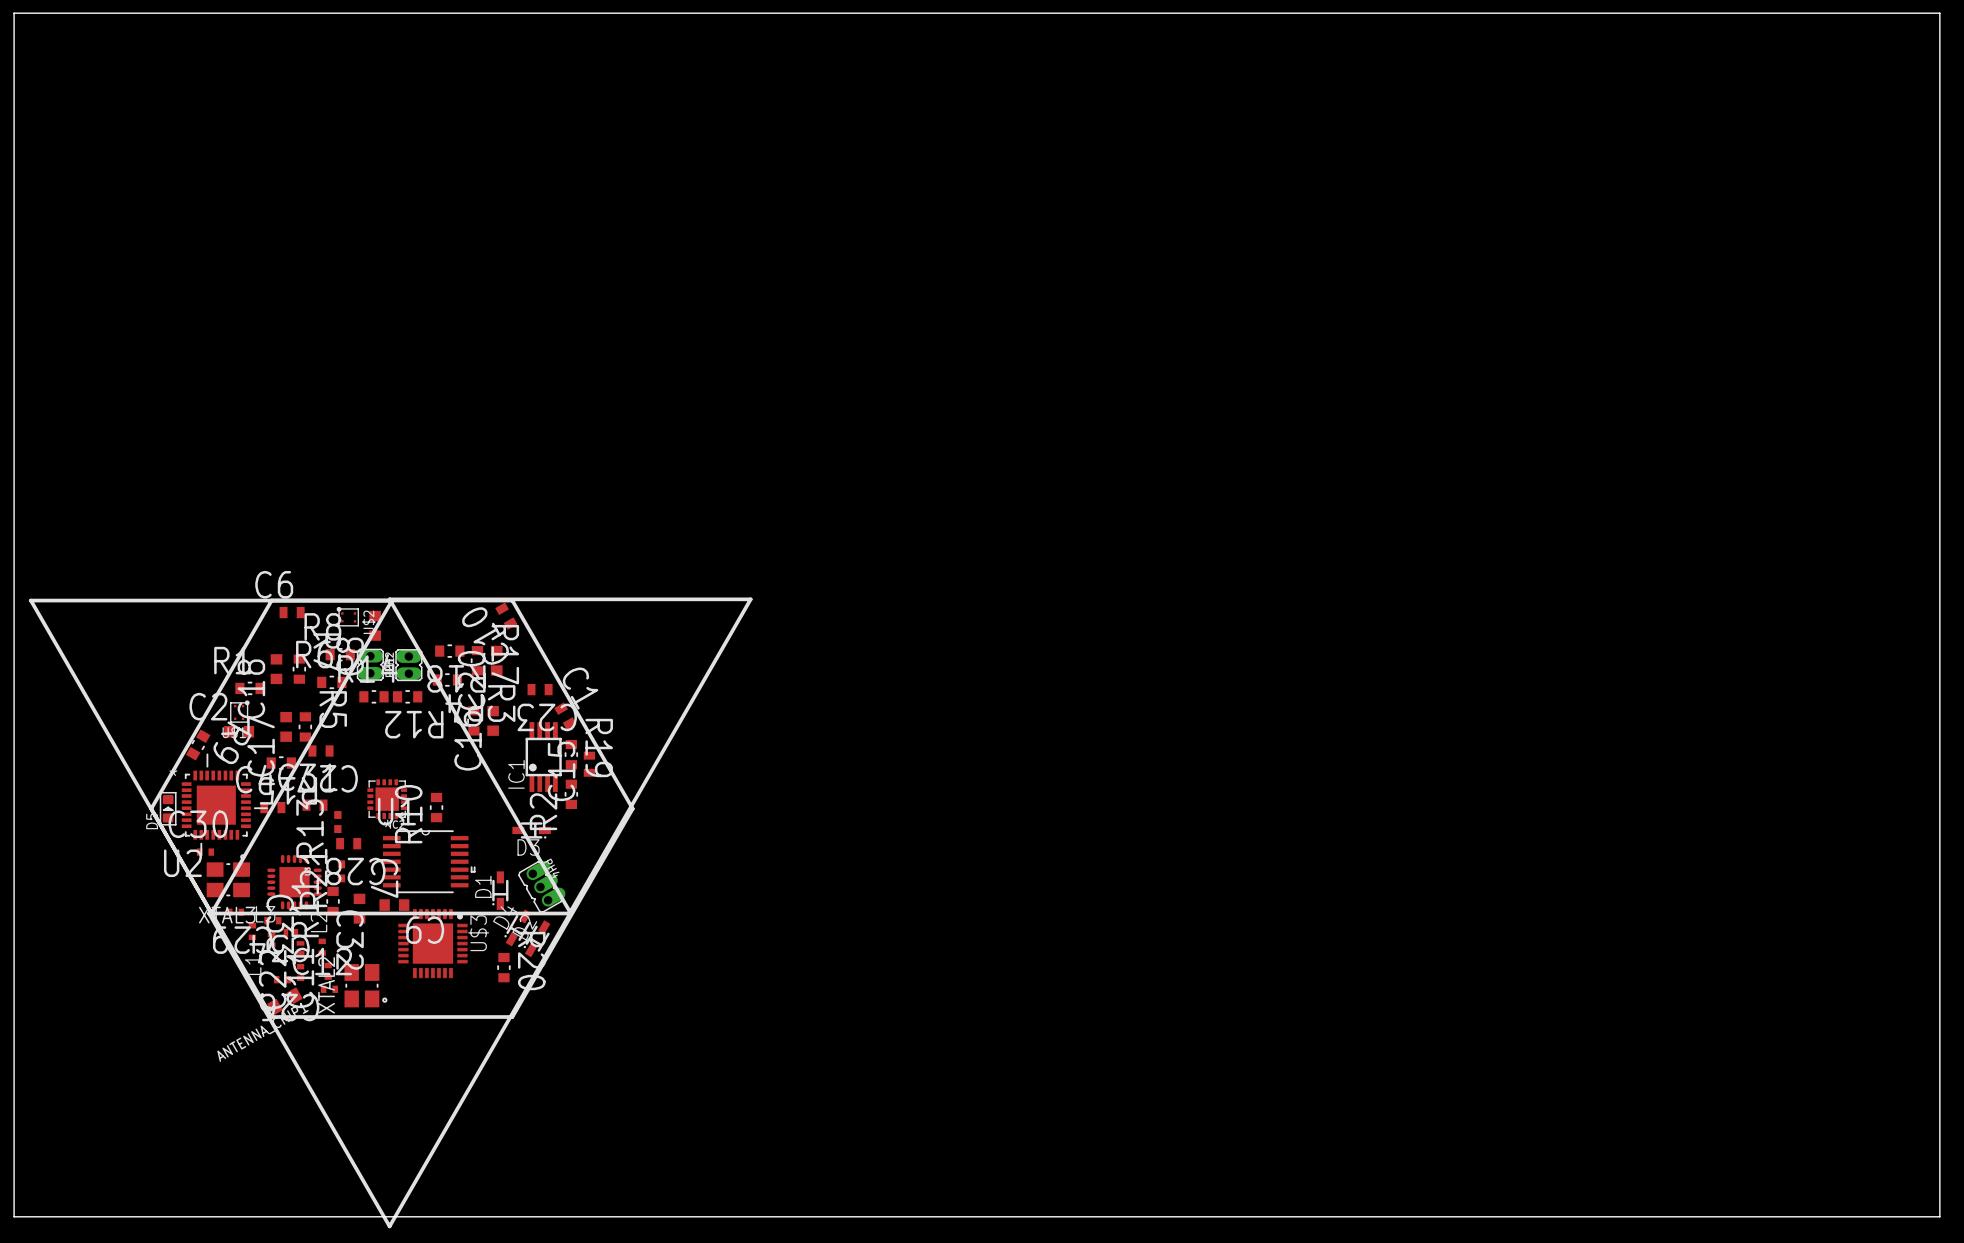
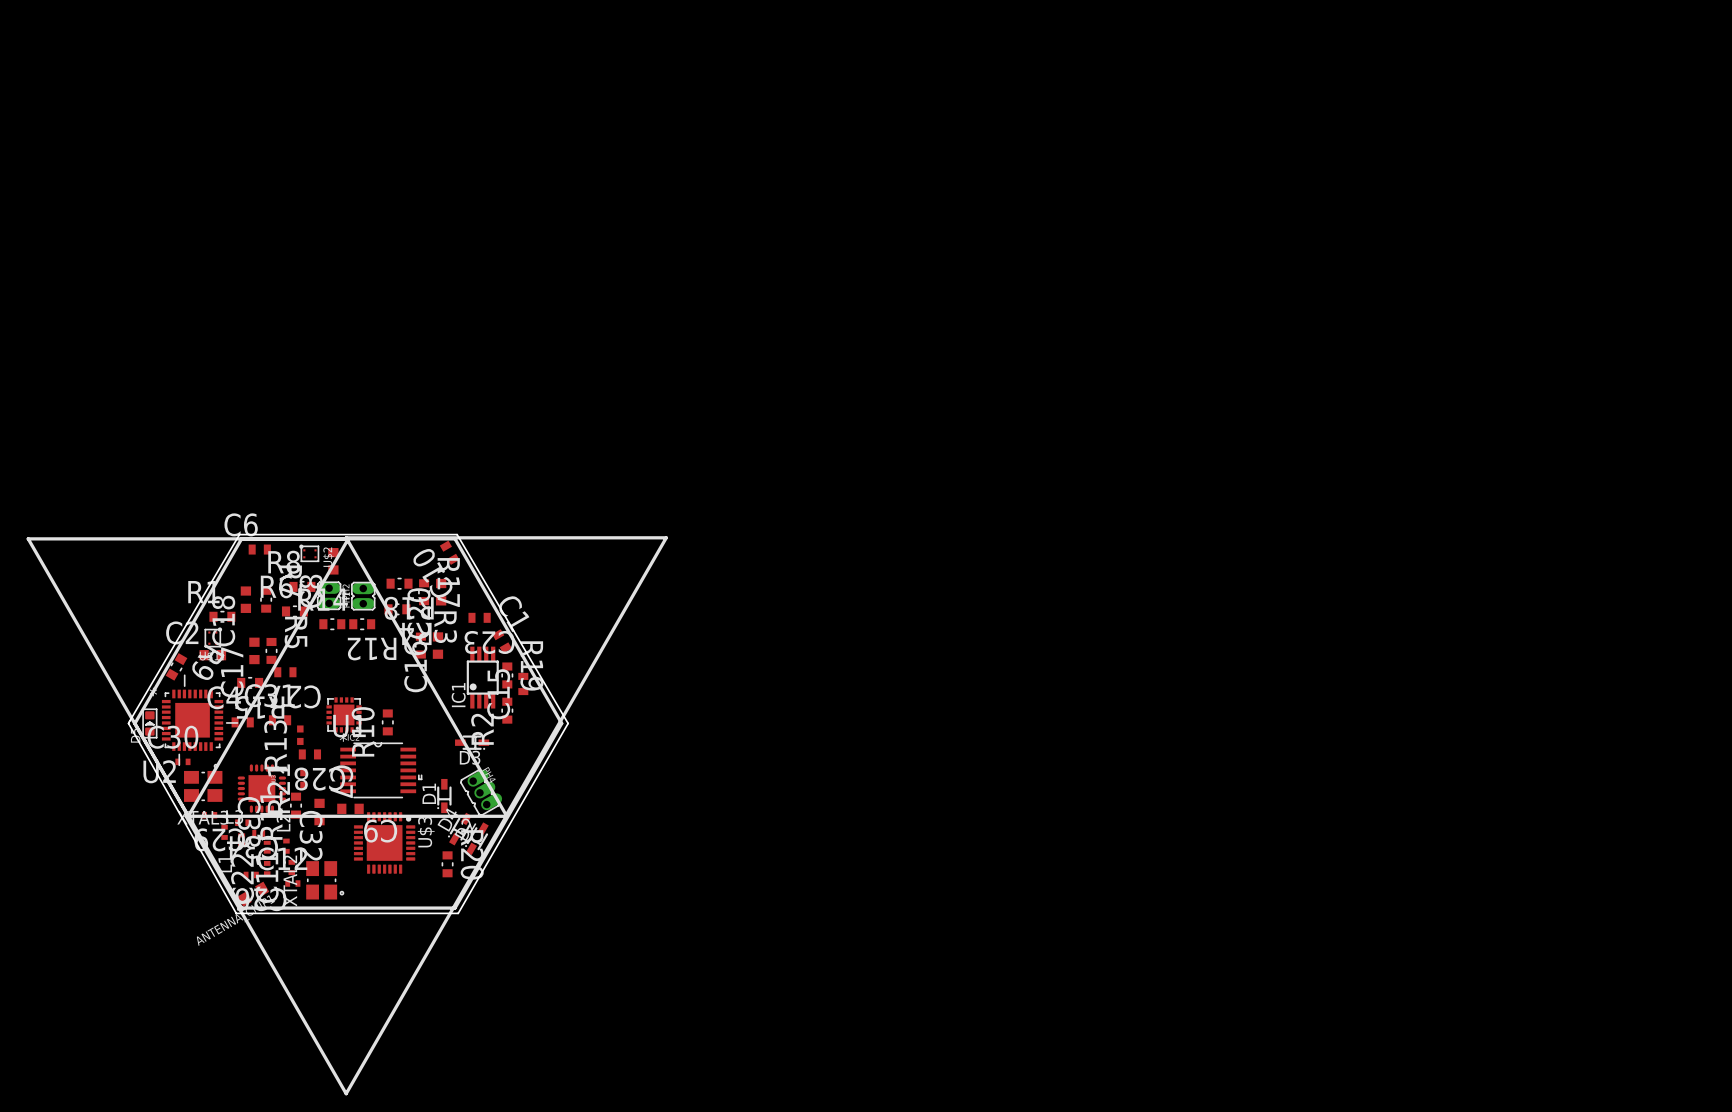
board edge: (14, 13) (1939, 13) (1939, 1216) (14, 1216) (14, 13) -> none
board edge: none -> (239, 534) (457, 534) (568, 723) (458, 913) (236, 913) (128, 723) (239, 534)

